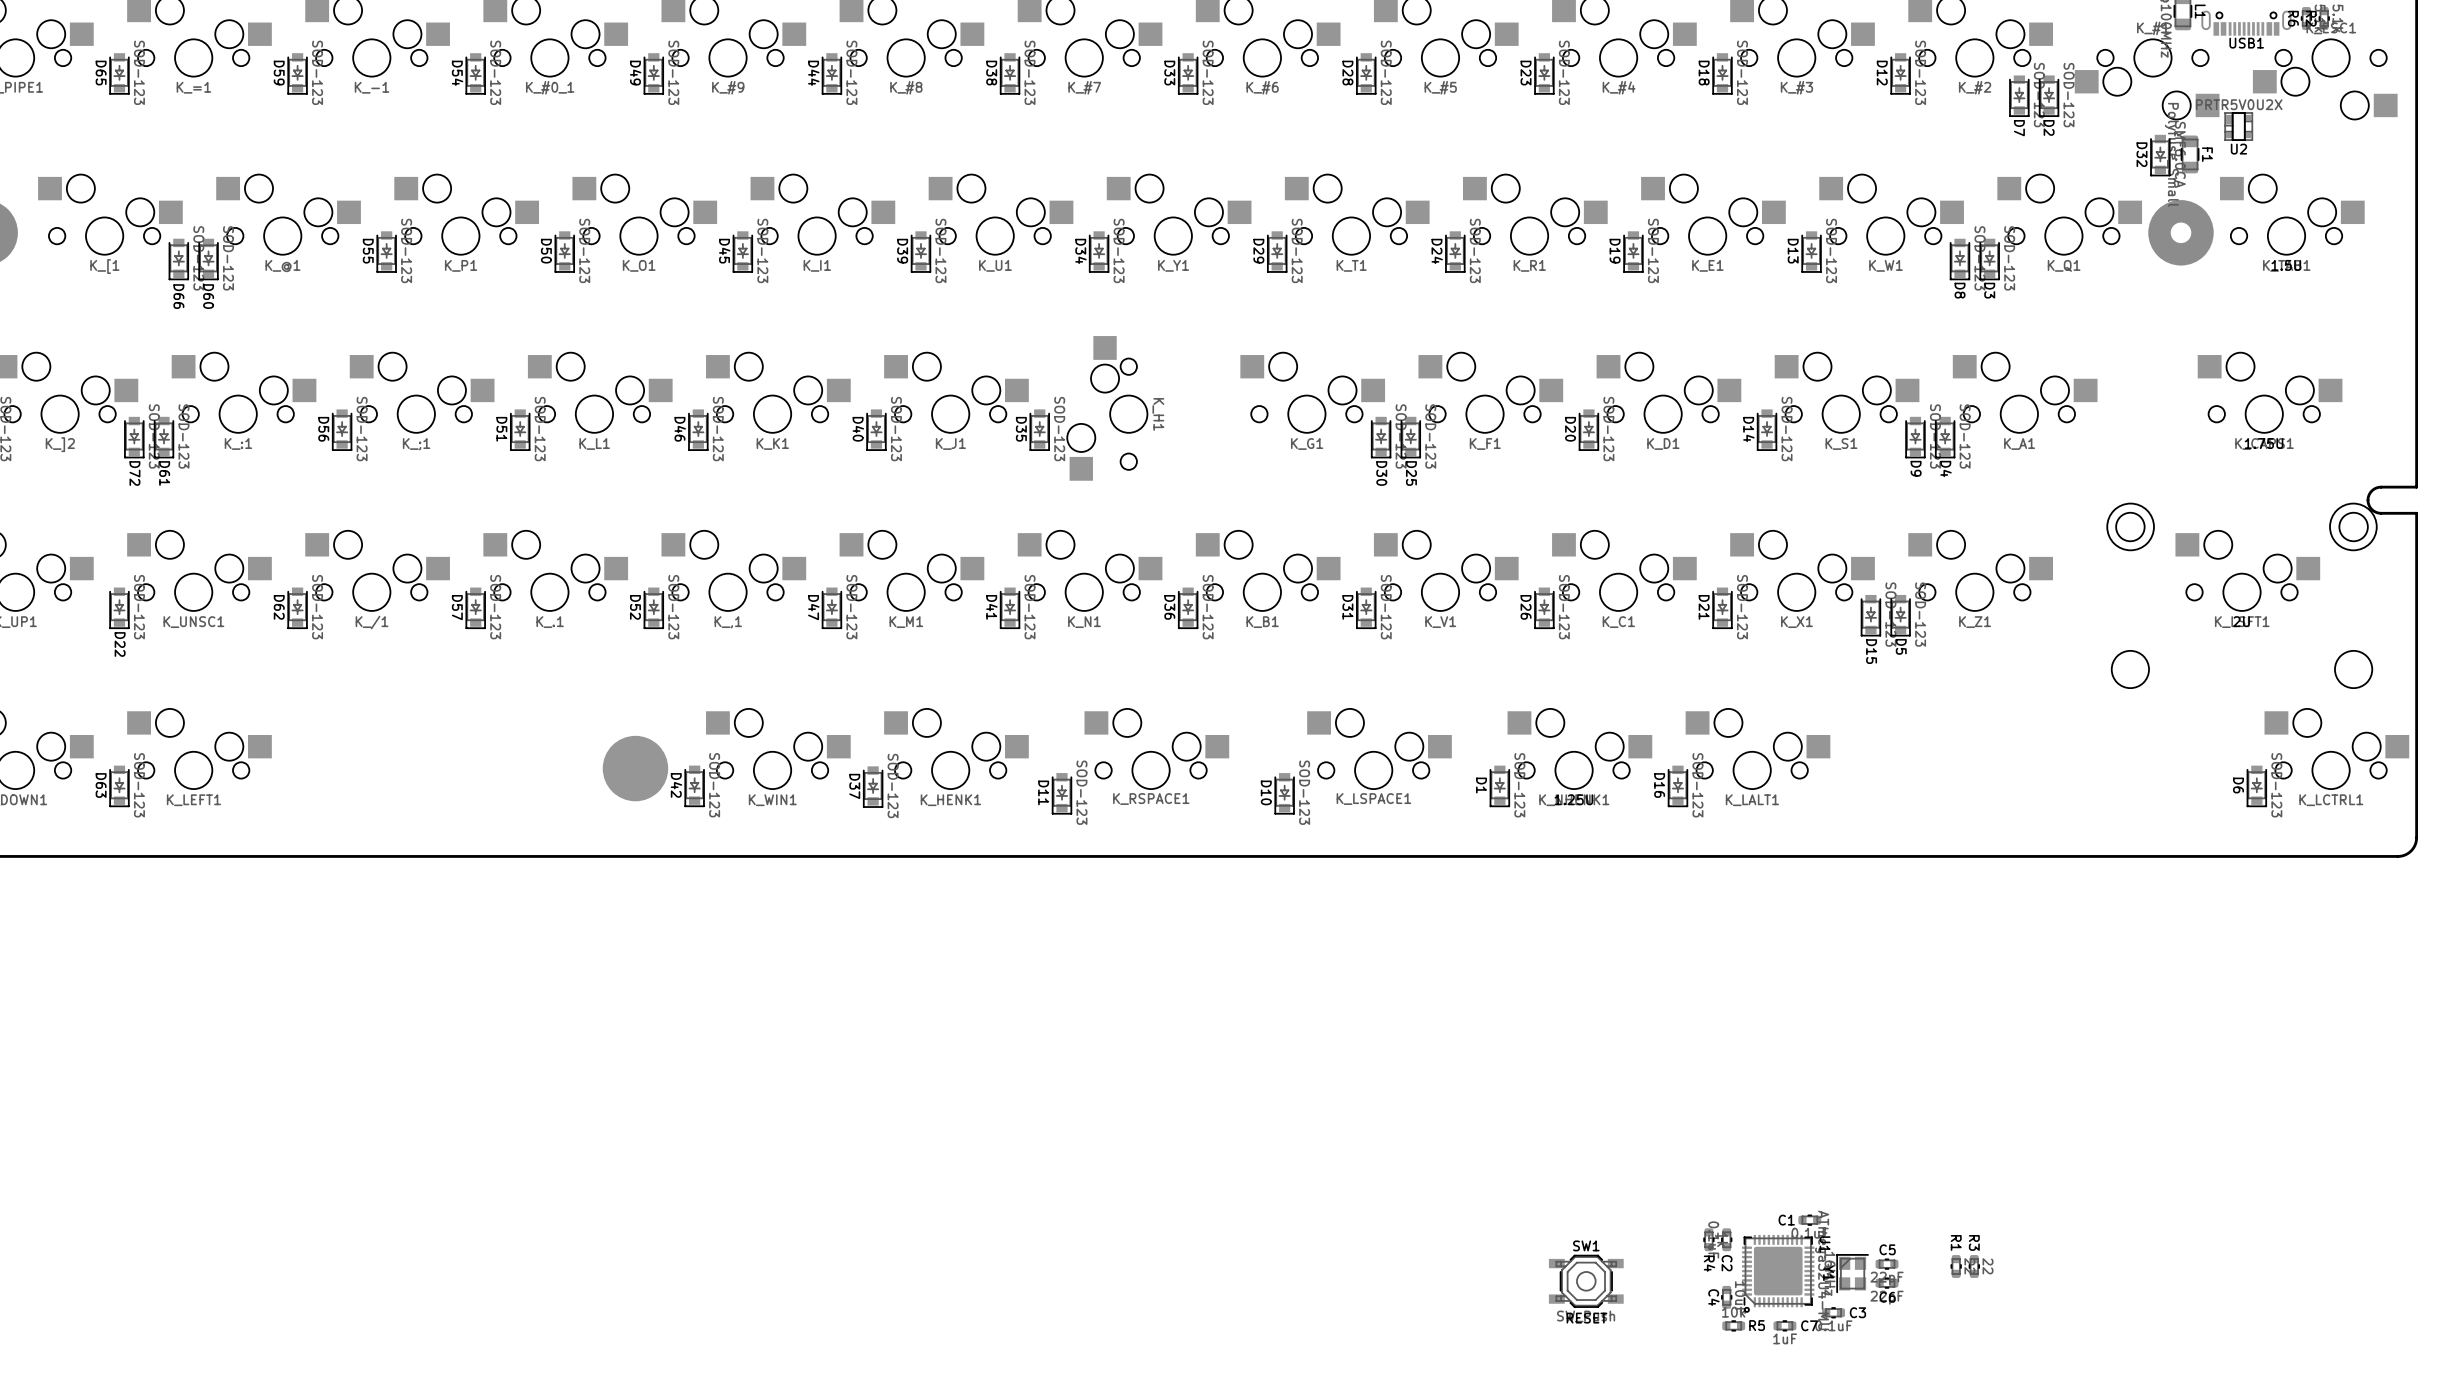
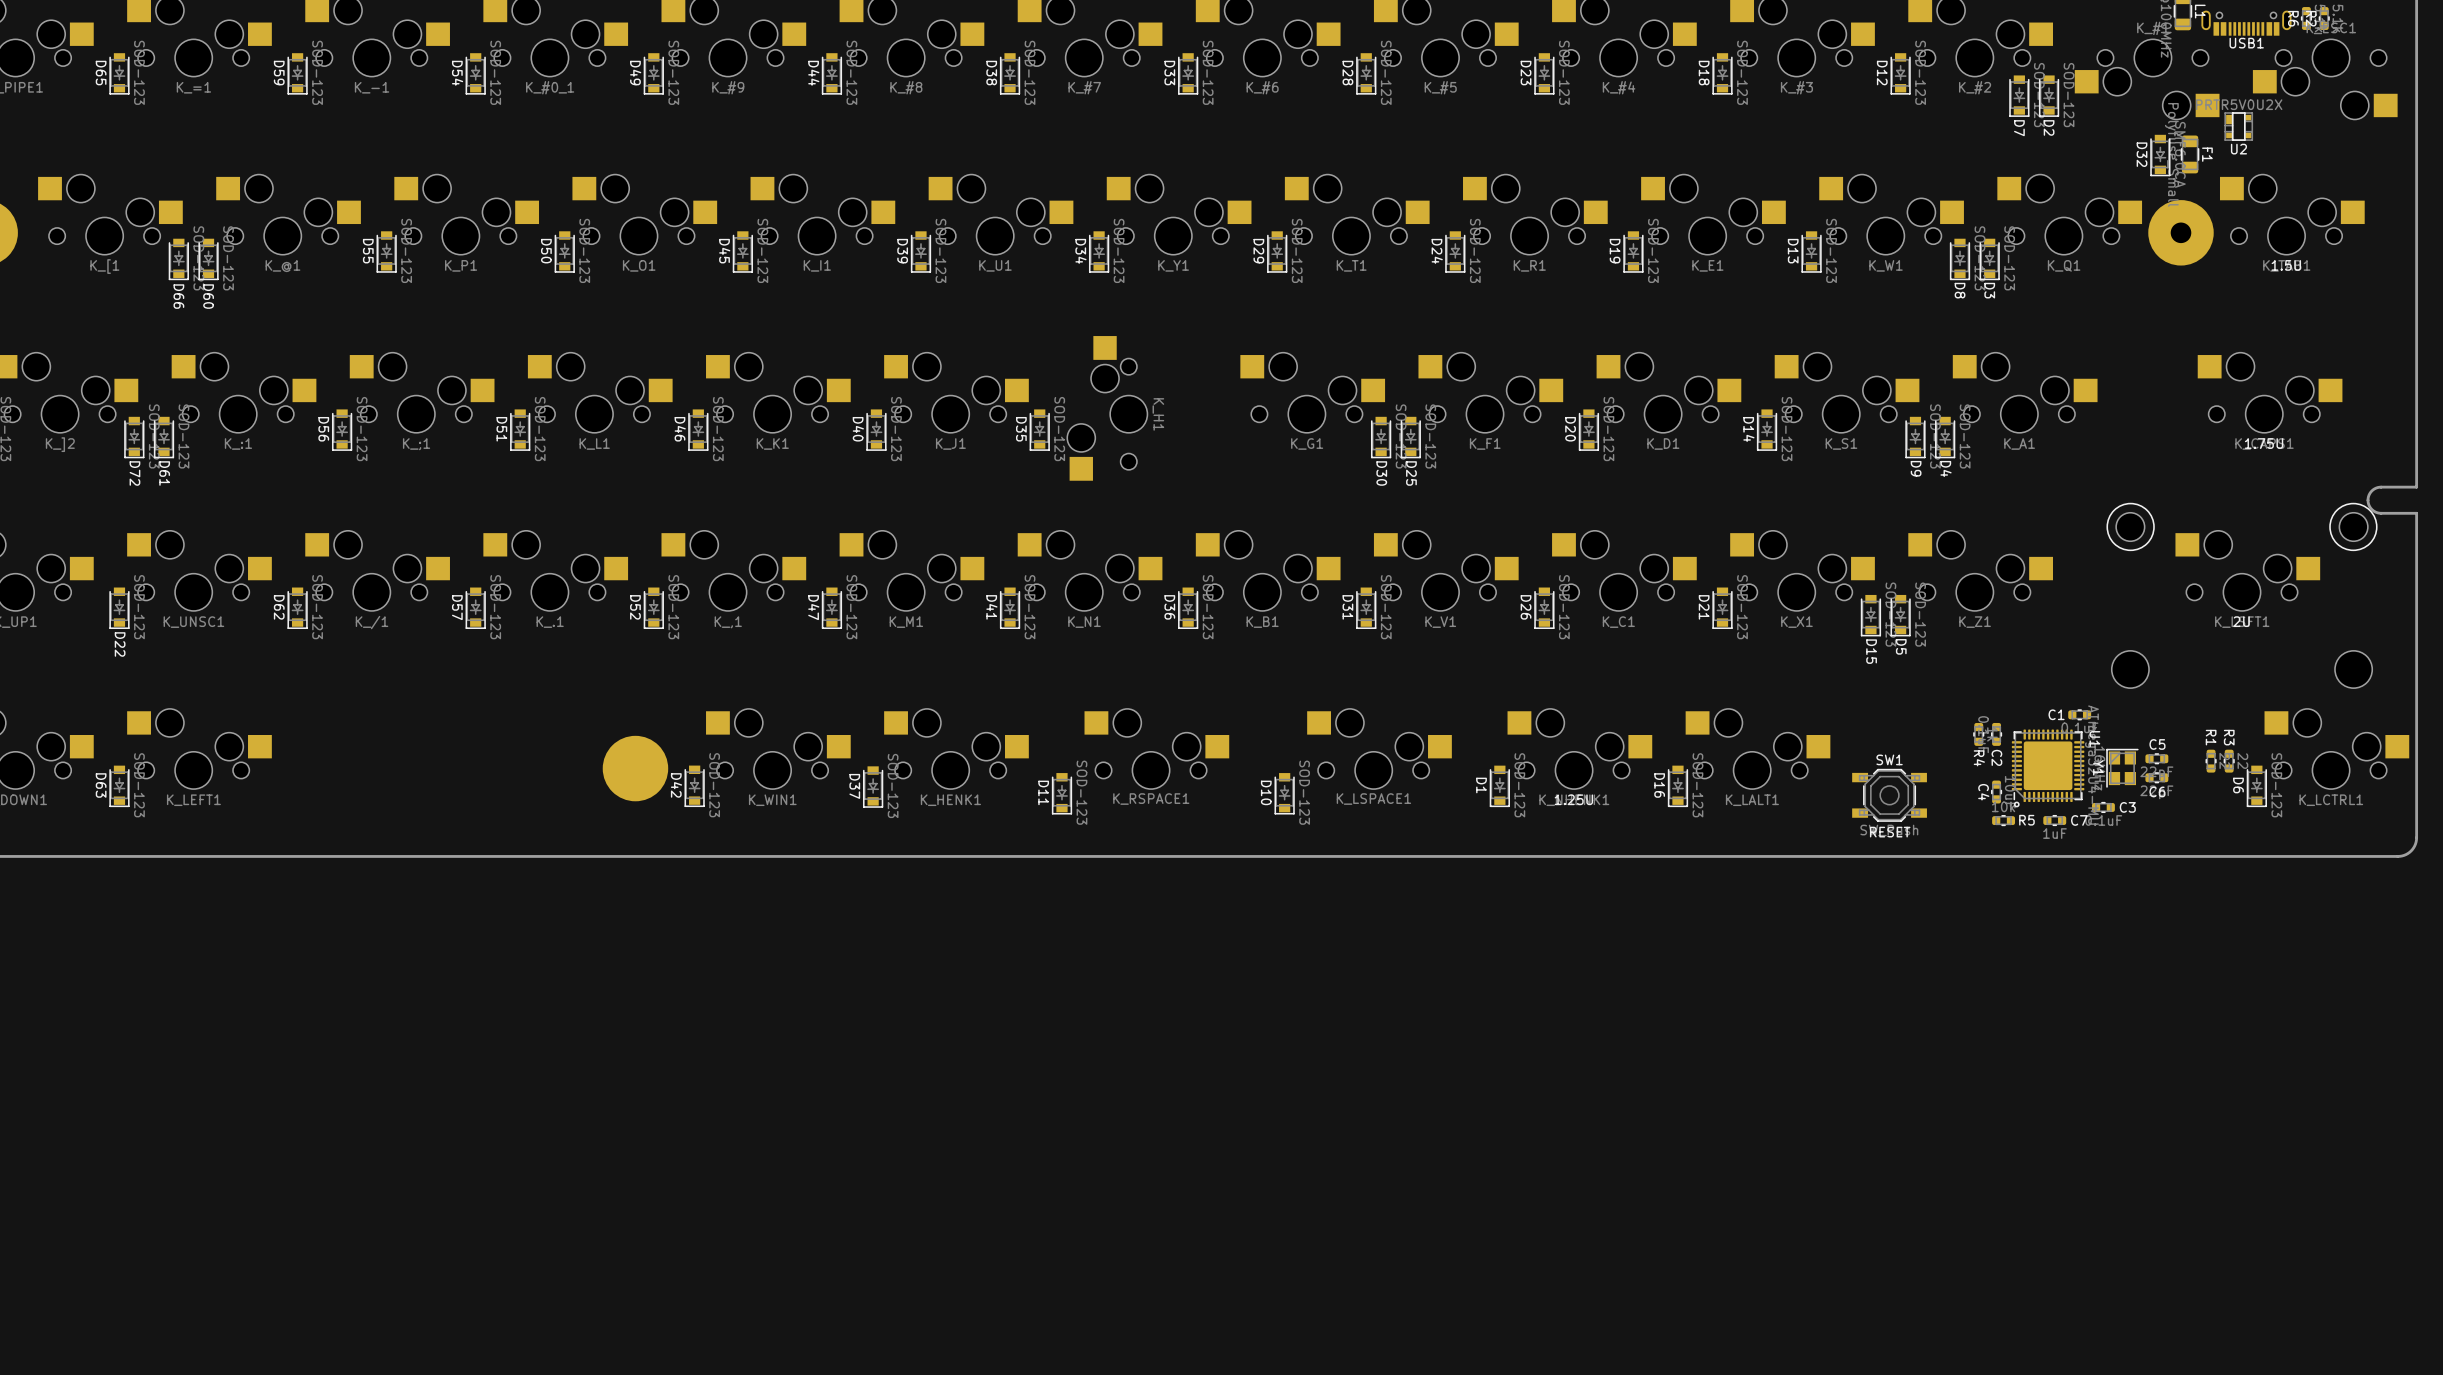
drawing: none -> [2013, 801, 2020, 808]
text: none -> RESET (1890, 832)
C1 position: (1809, 1220) -> (2079, 714)
R4 position: (1708, 1239) -> (1978, 734)
C2 position: (1726, 1239) -> (1996, 734)
C5 position: (1887, 1264) -> (2156, 758)
R1 position: (1956, 1266) -> (2211, 761)
R3 position: (1974, 1266) -> (2229, 761)
U1 position: (1778, 1271) -> (2048, 765)
Y1 position: (1852, 1273) -> (2122, 768)
SW1 position: (1586, 1281) -> (1889, 795)
C6 position: (1887, 1283) -> (2156, 777)
C4 position: (1726, 1297) -> (1996, 792)
drawing: [1744, 1307, 1750, 1313] -> none
C3 position: (1833, 1312) -> (2103, 807)
text: RESET (1586, 1318) -> none
R5 position: (1733, 1325) -> (2003, 820)
C7 position: (1784, 1325) -> (2054, 820)

